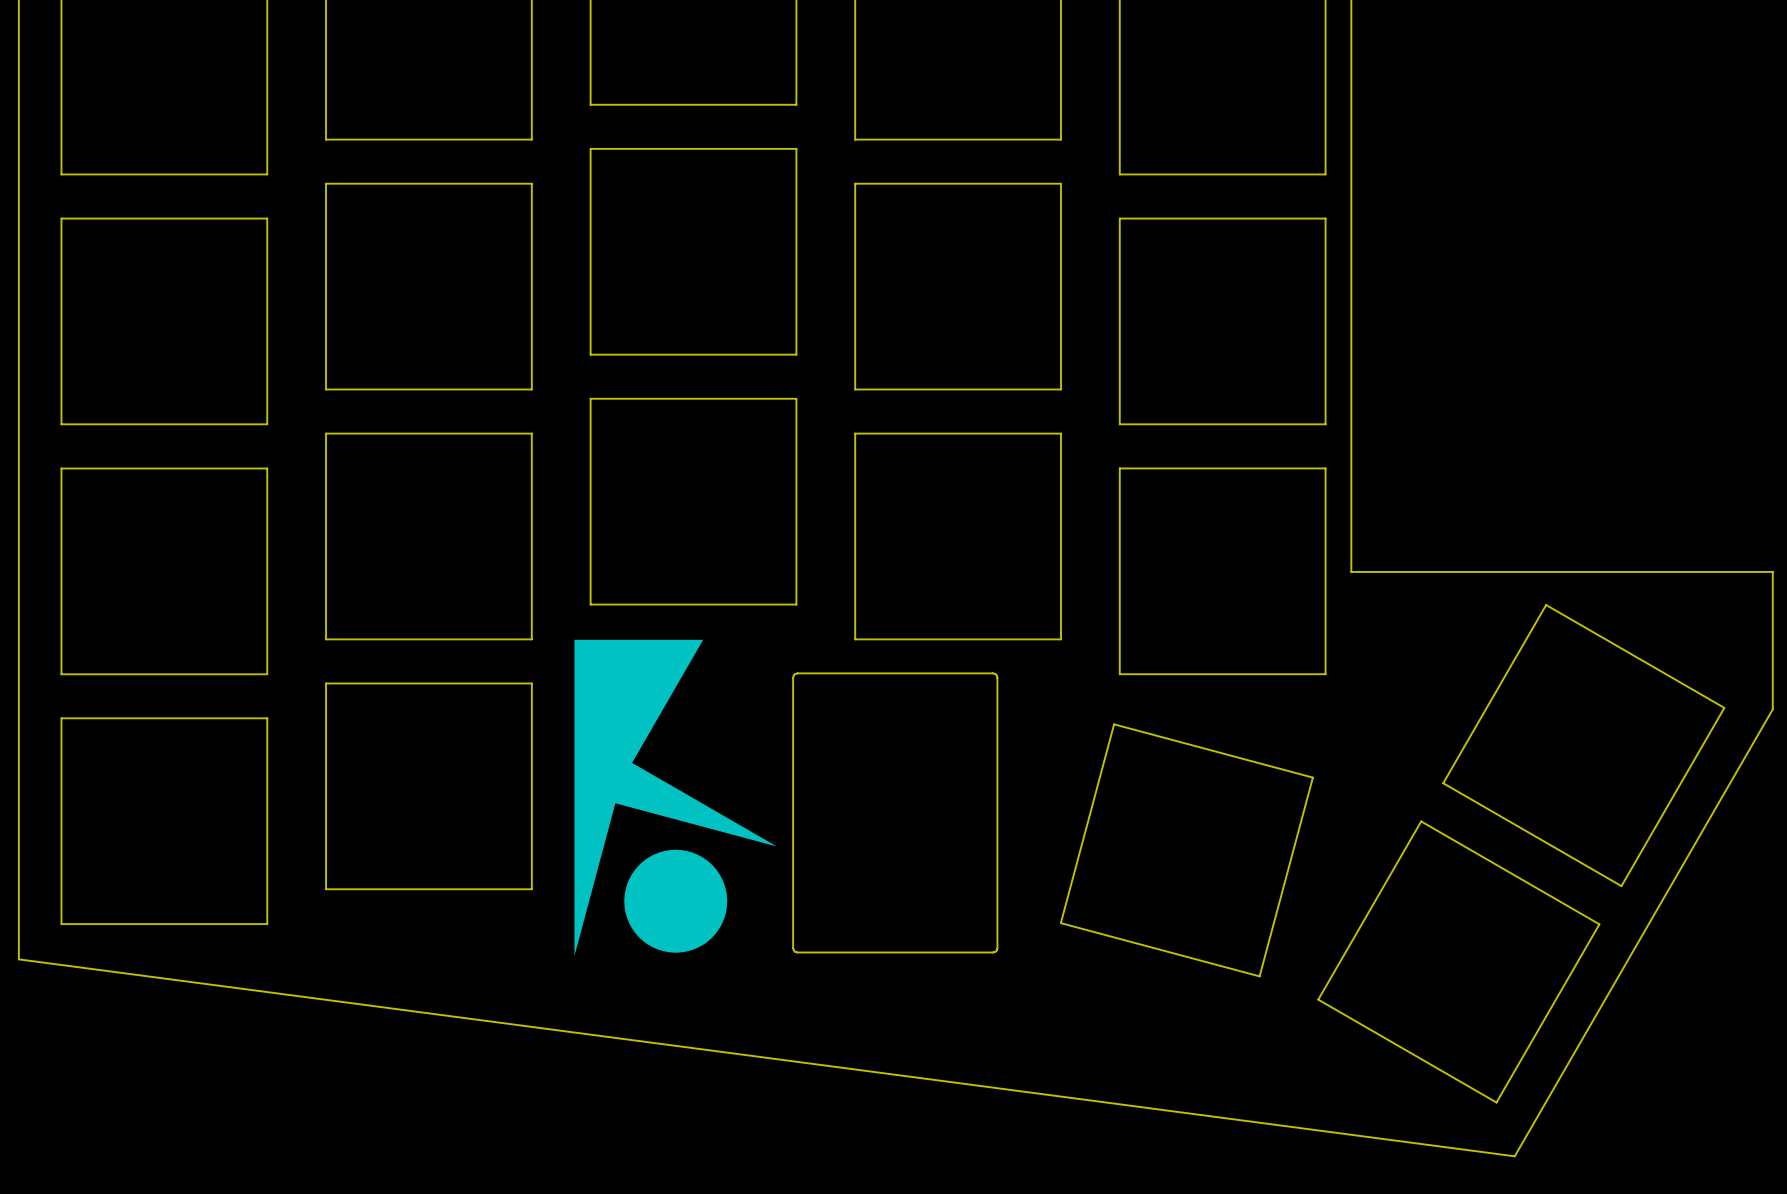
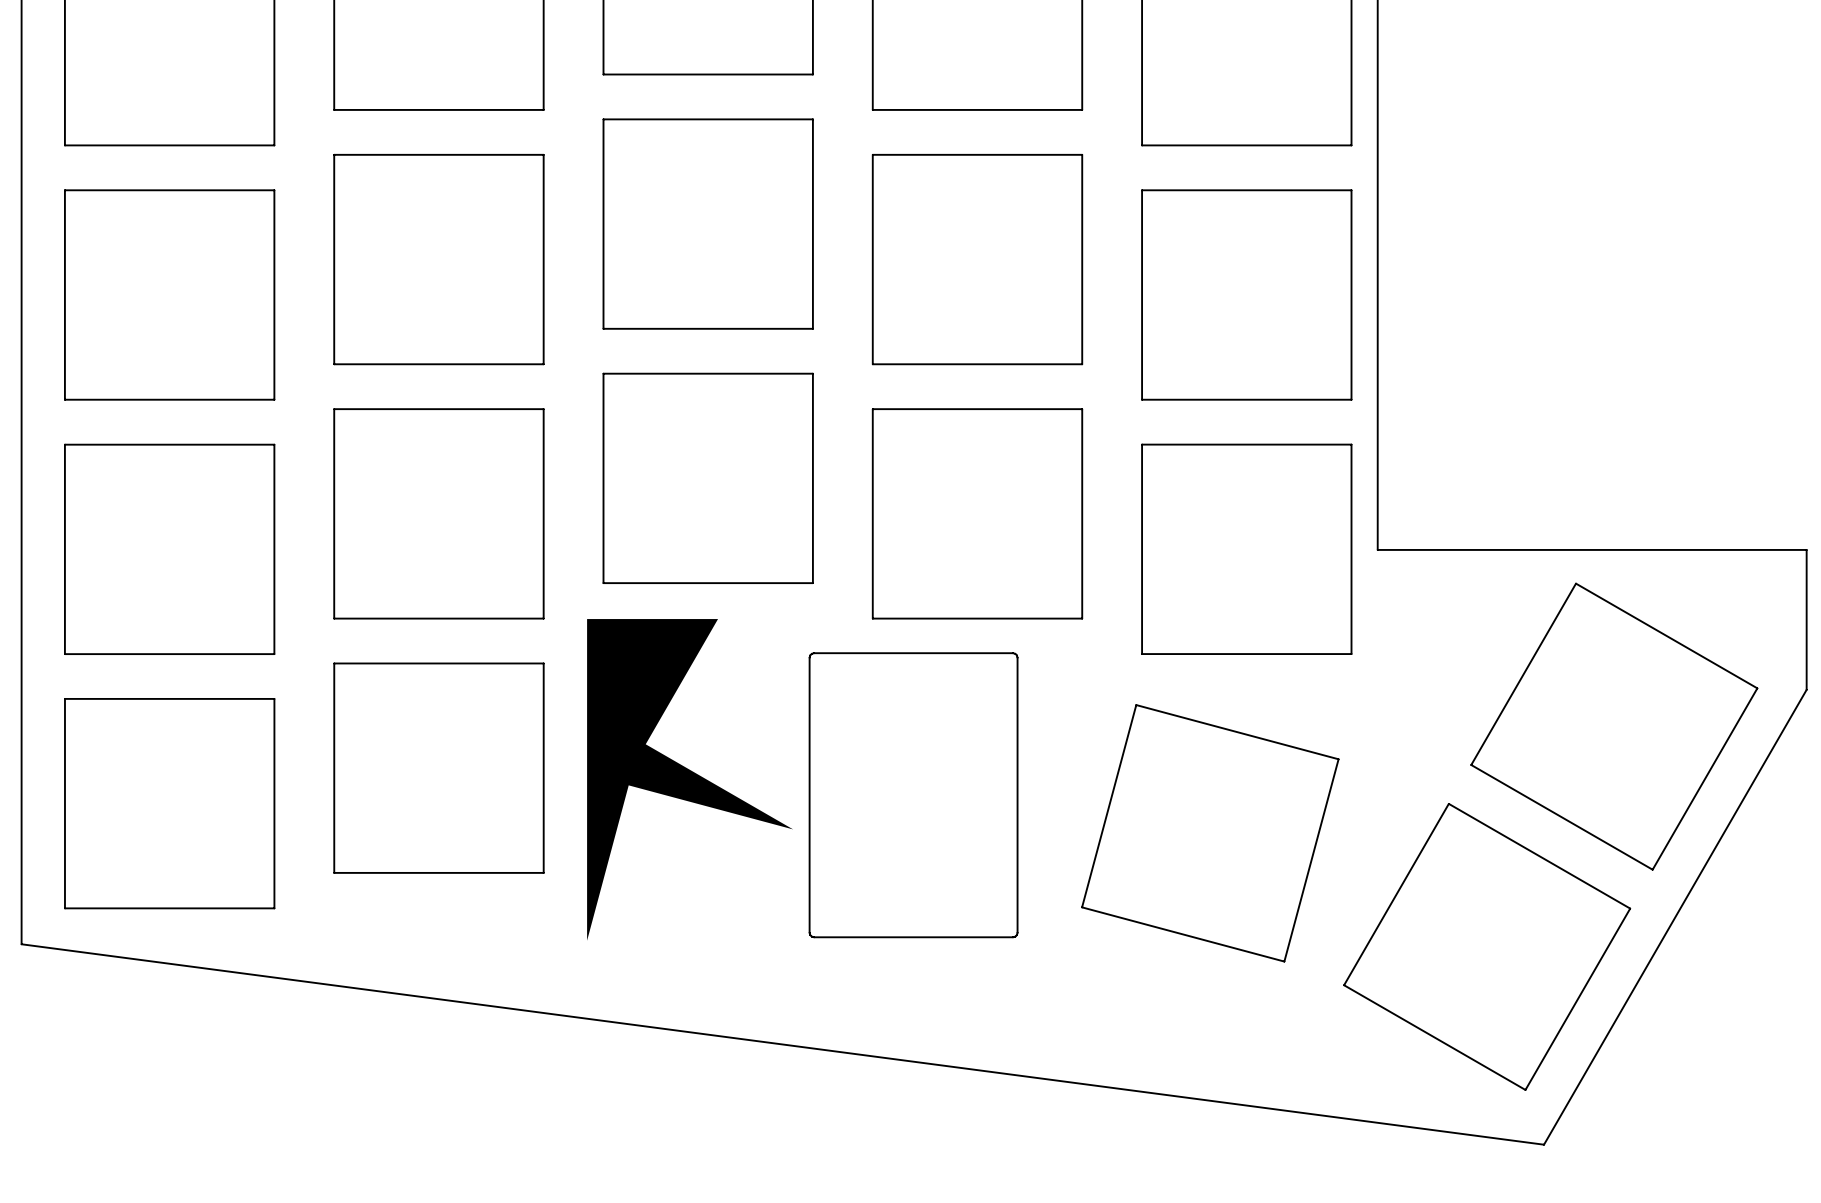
drawing: [624, 849, 728, 953] -> none

